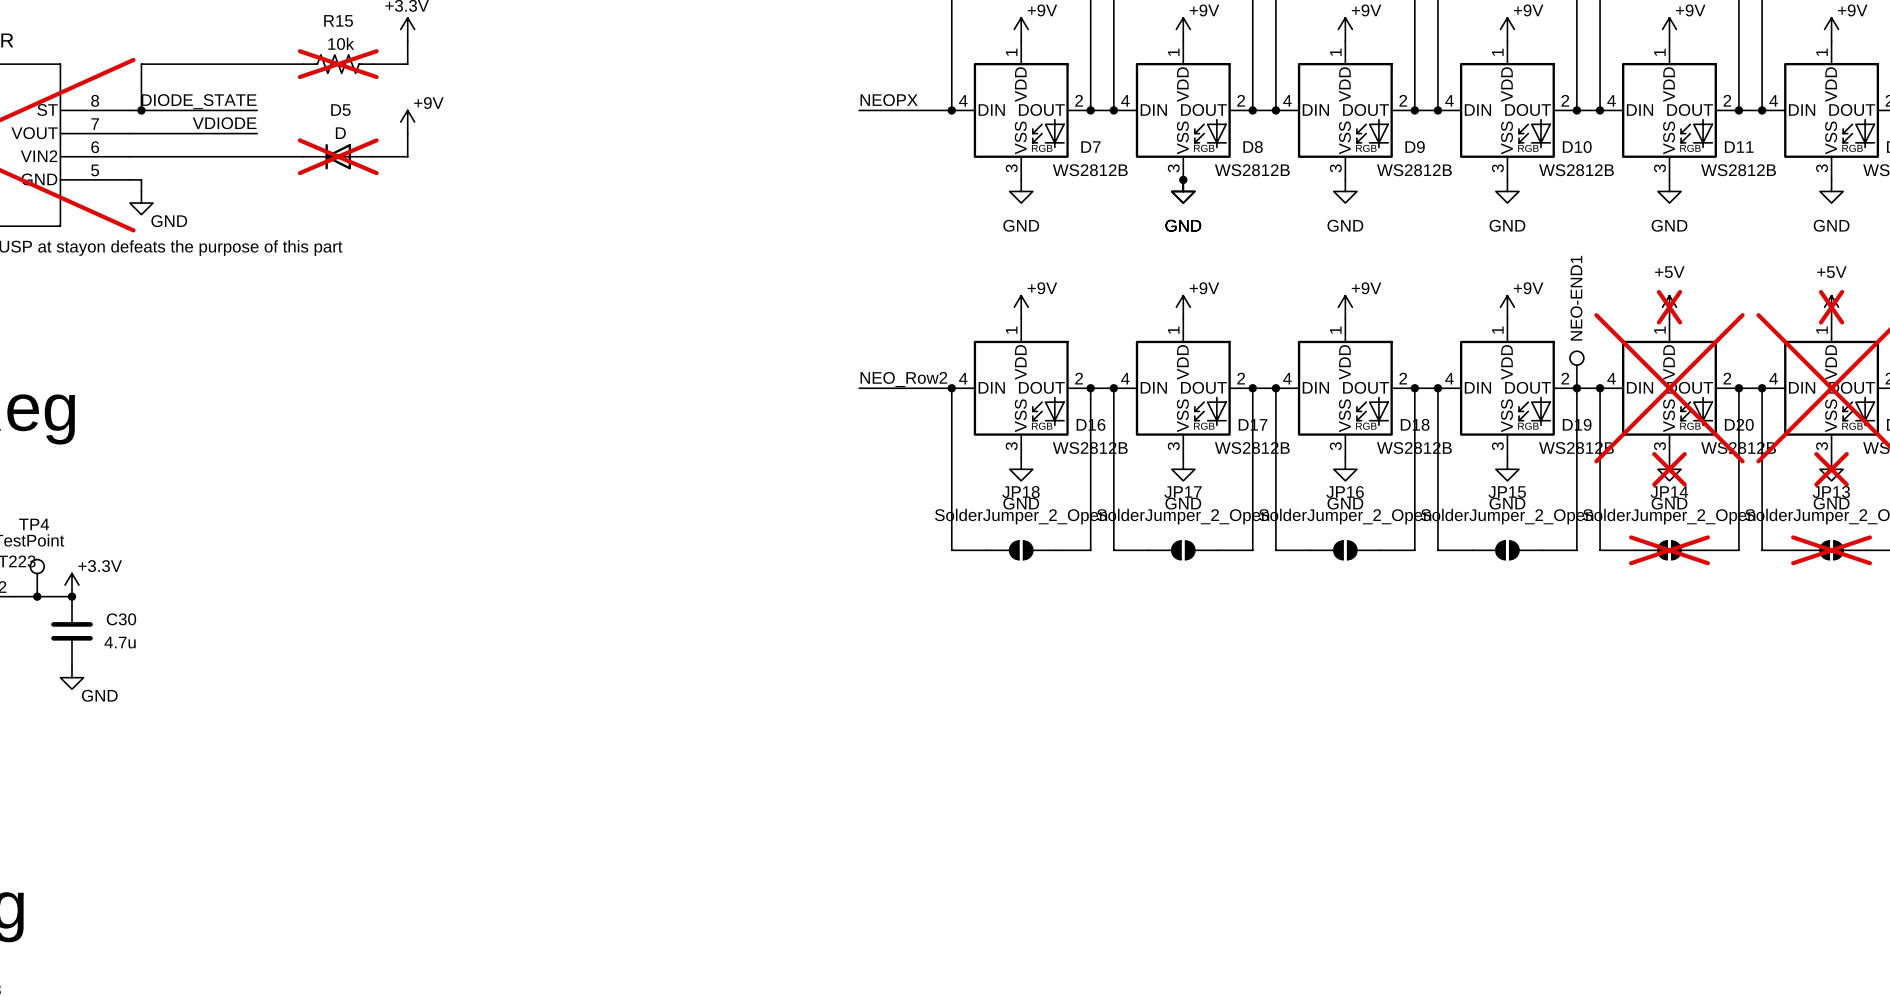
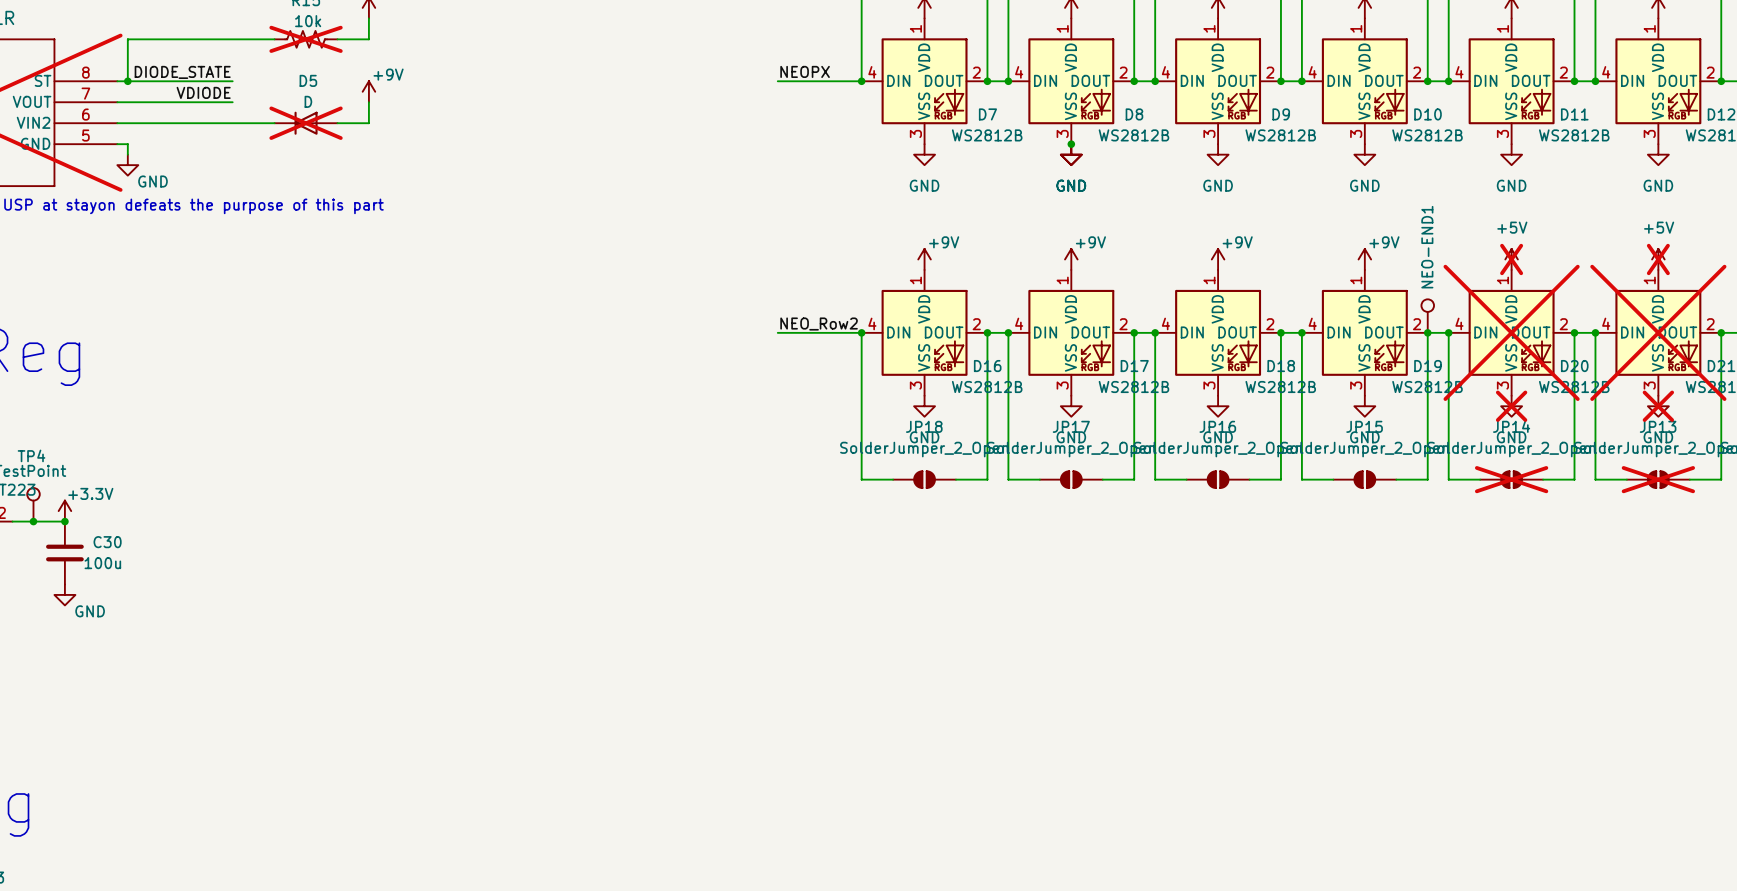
C30 value: 4.7u (120, 642) -> 100u (102, 563)

